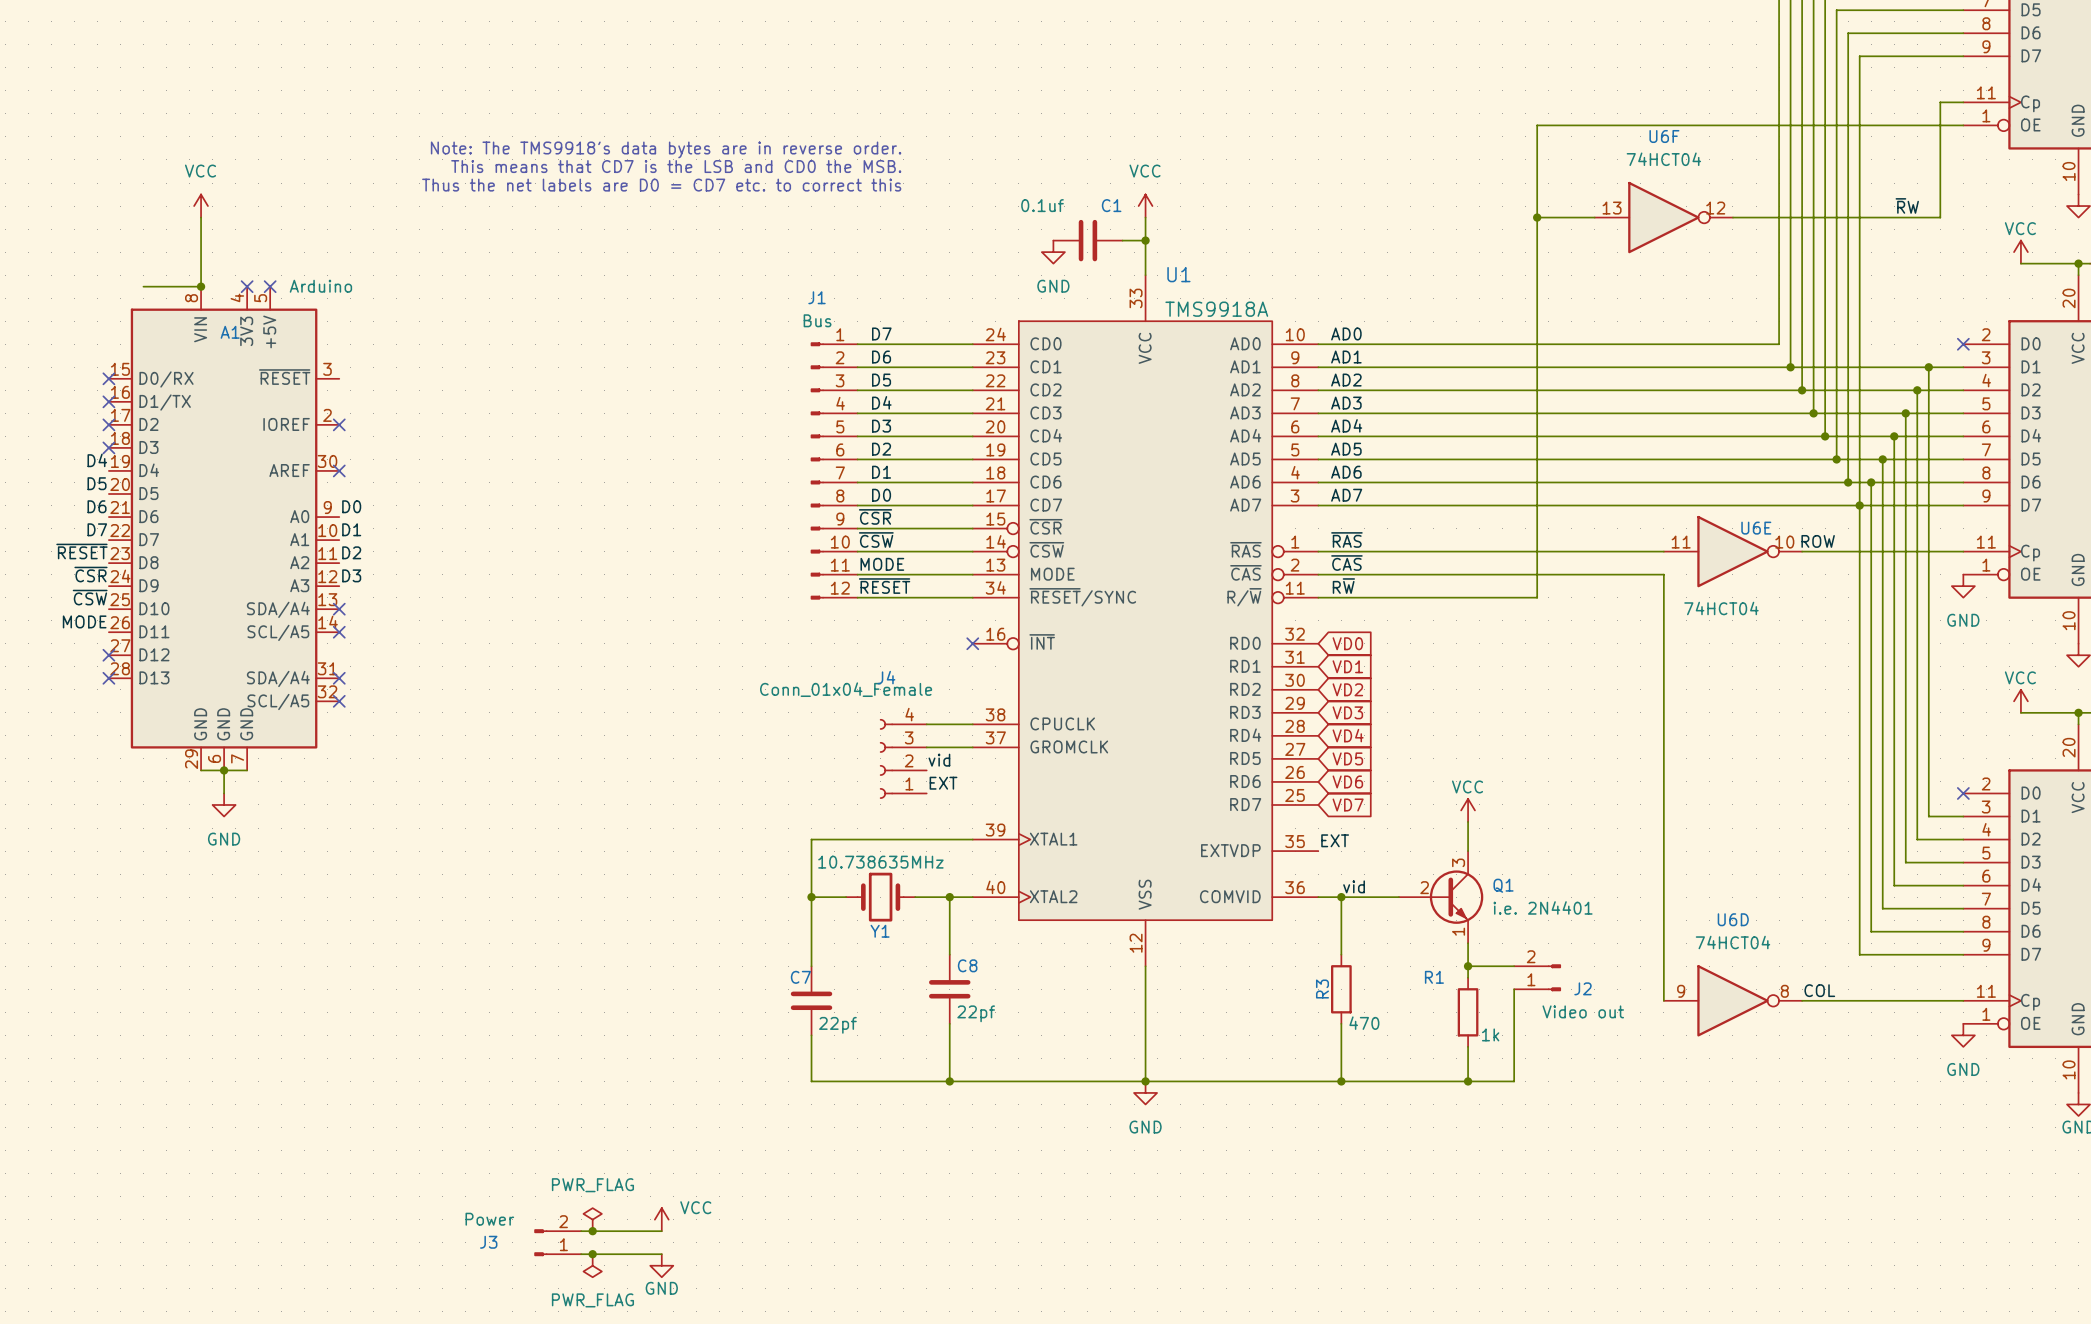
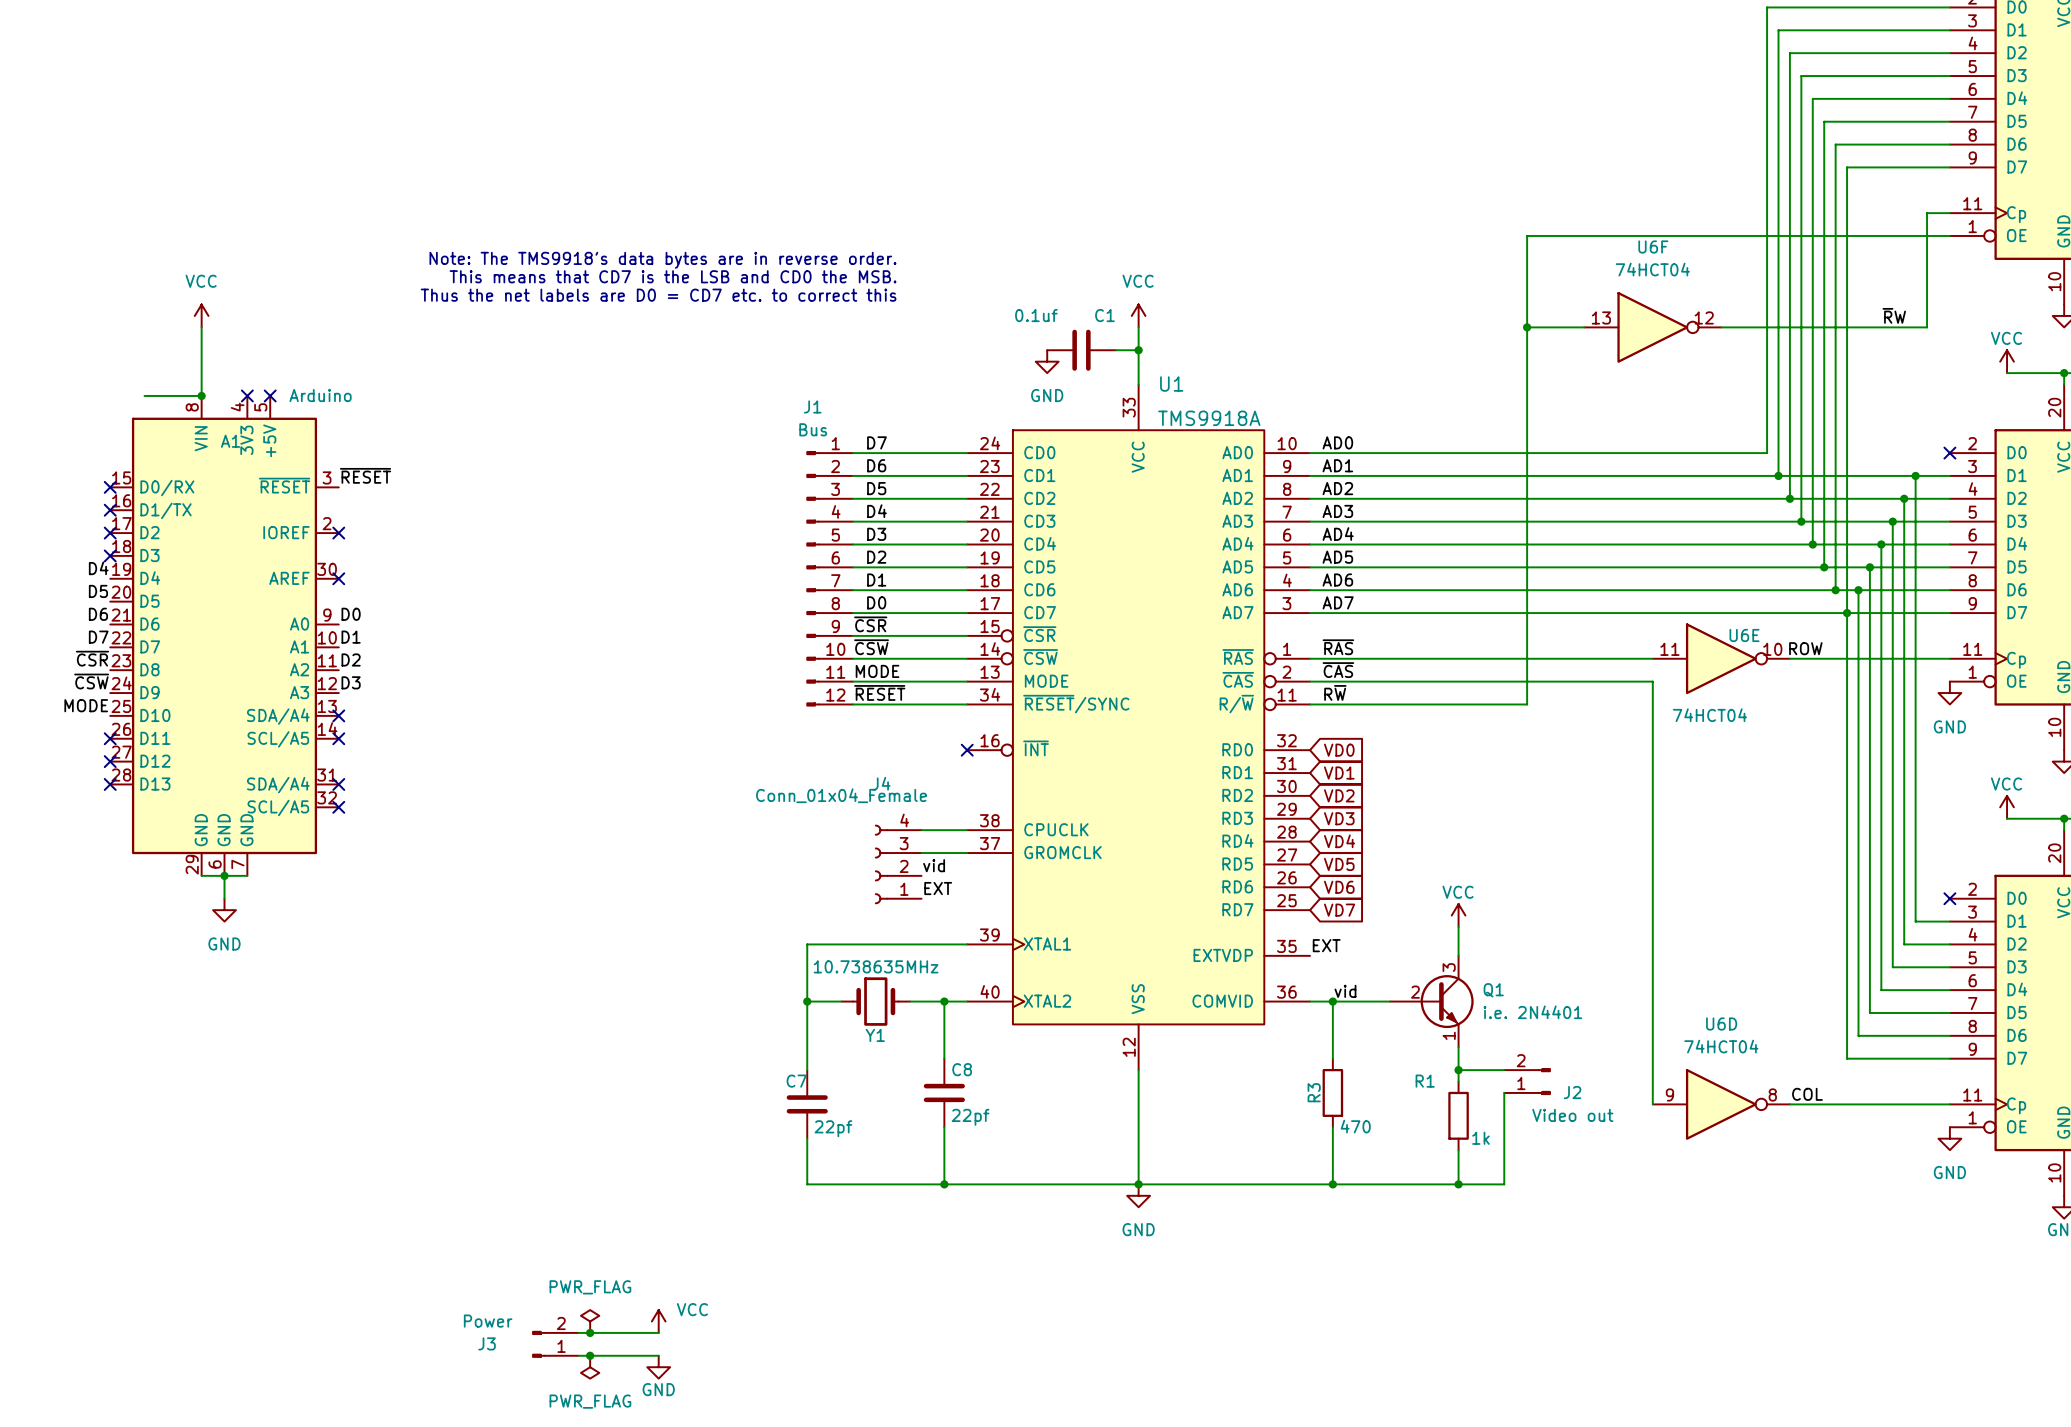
label: none -> ~{RESET} (365, 475)
label: ~{RESET} (81, 551) -> ~{CSR} (92, 658)
label: ~{CSR} (90, 574) -> ~{CSW} (91, 681)
label: ~{CSW} (90, 597) -> MODE (86, 705)
label: MODE (84, 621) -> none
no-connect mark: none -> (110, 738)

